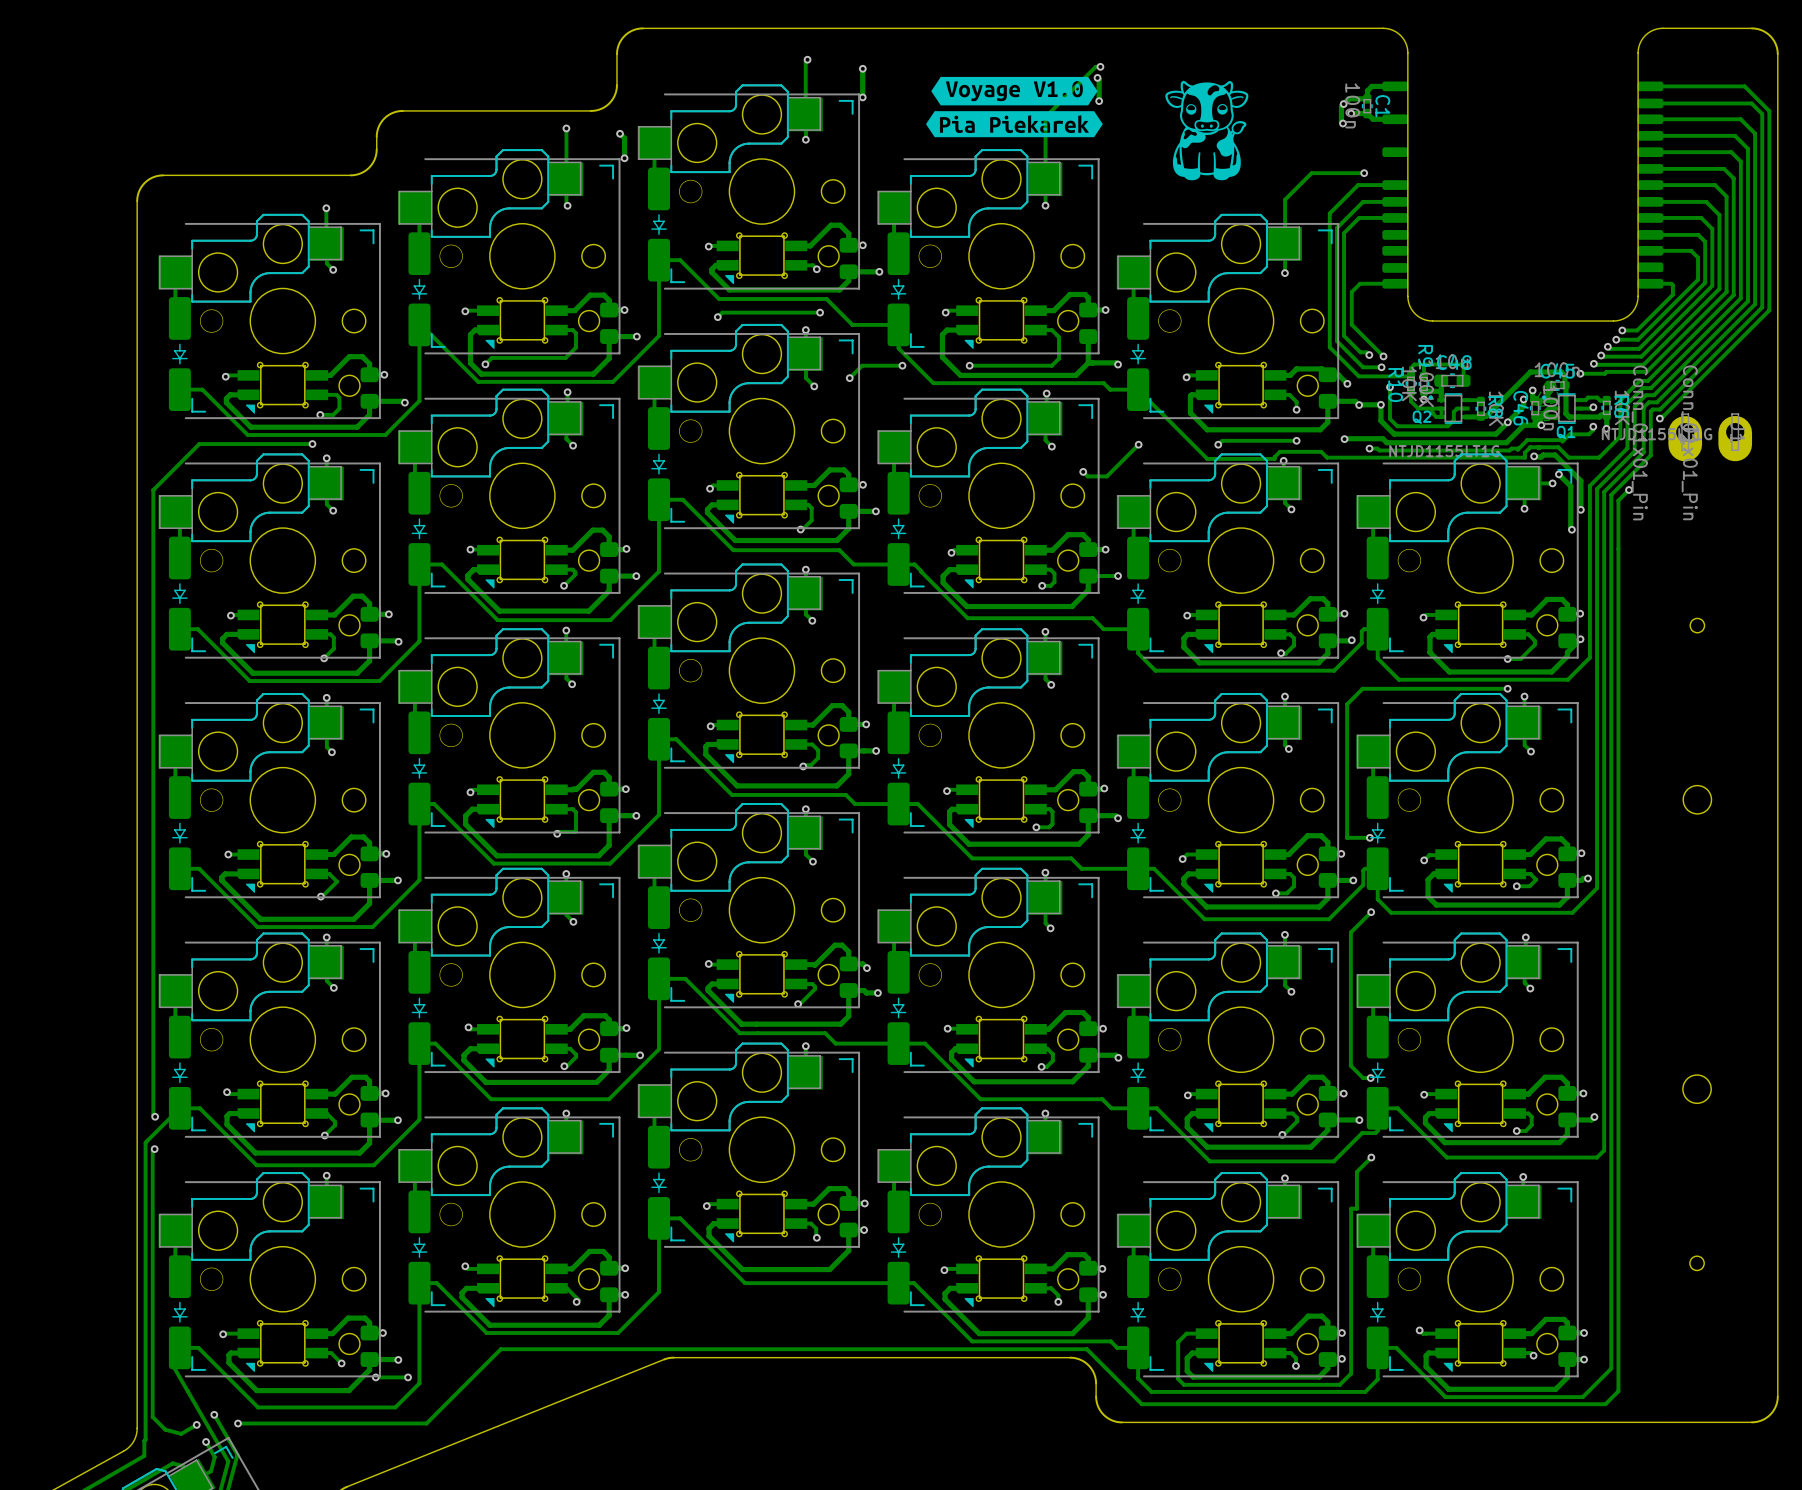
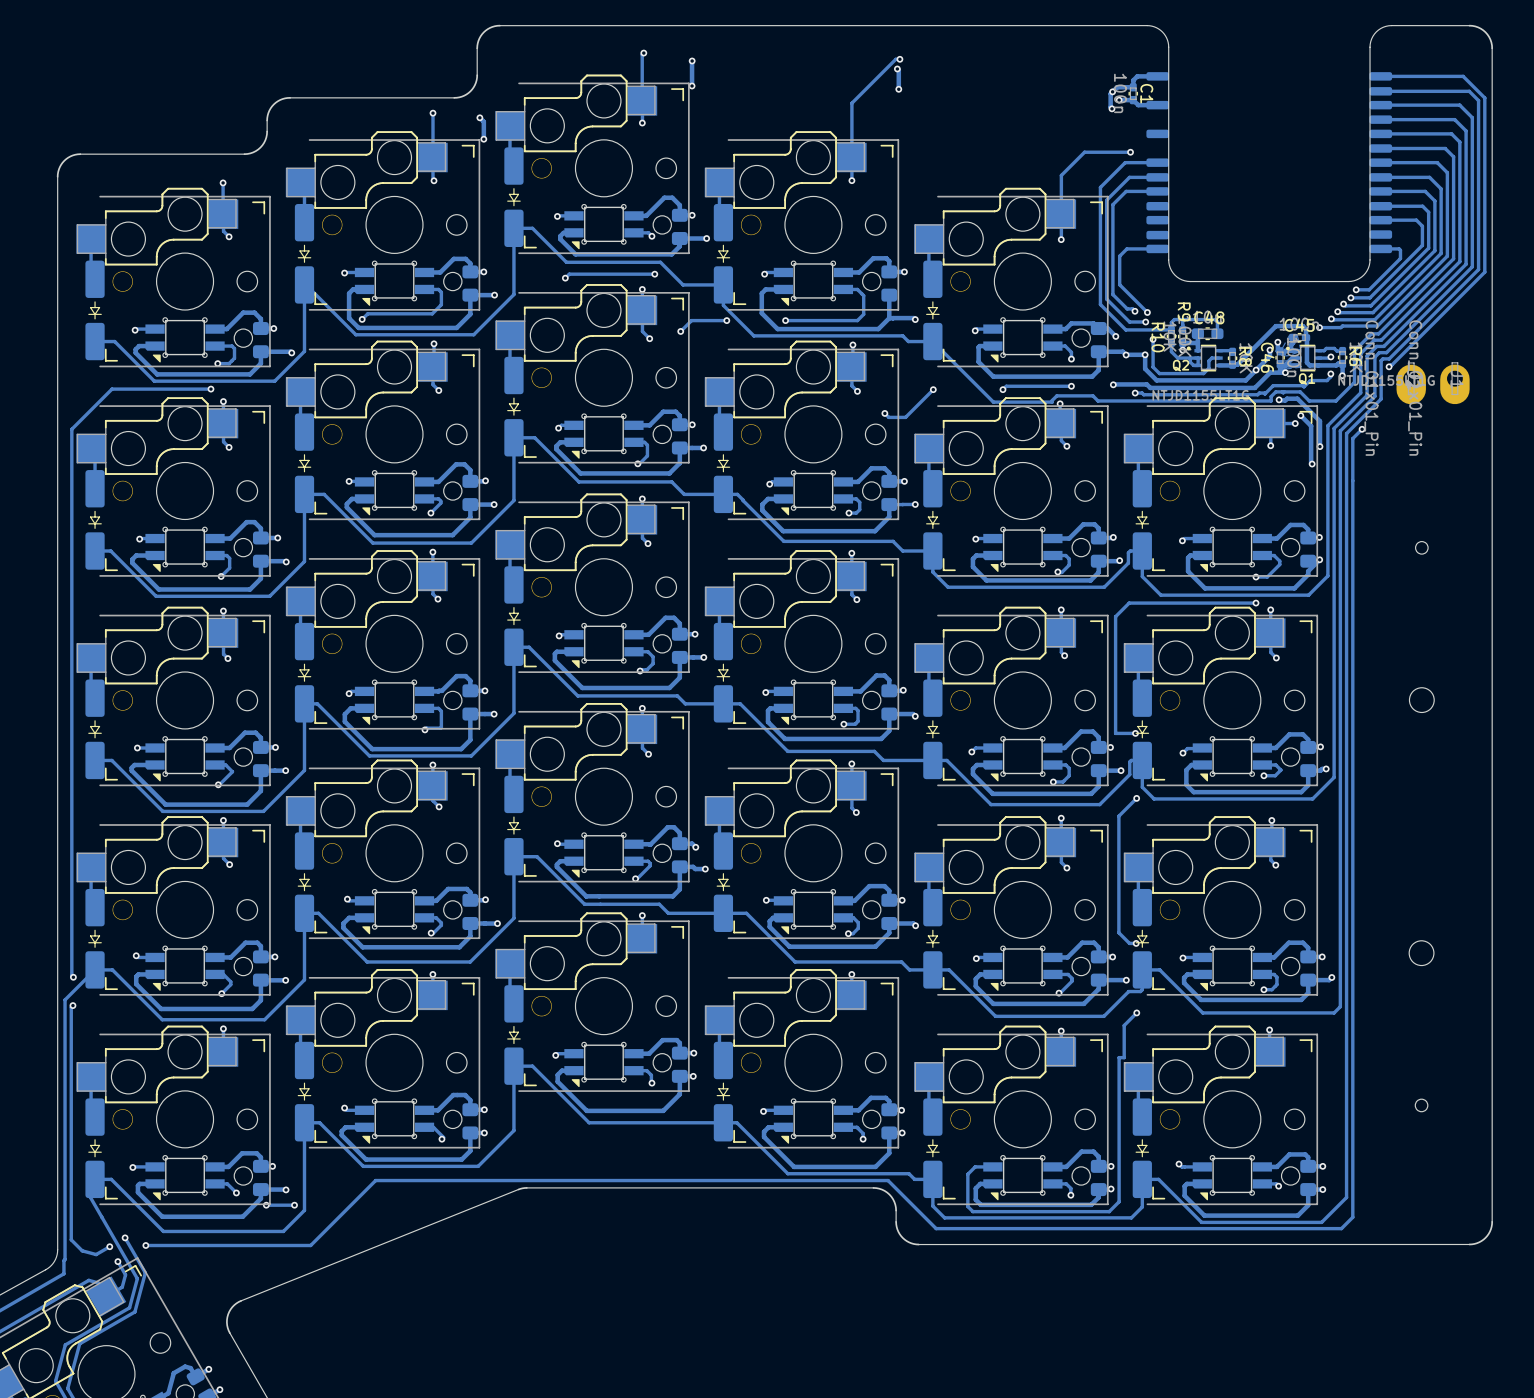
drawing: [926, 76, 1103, 138] -> none
drawing: [1165, 80, 1249, 181] -> none

